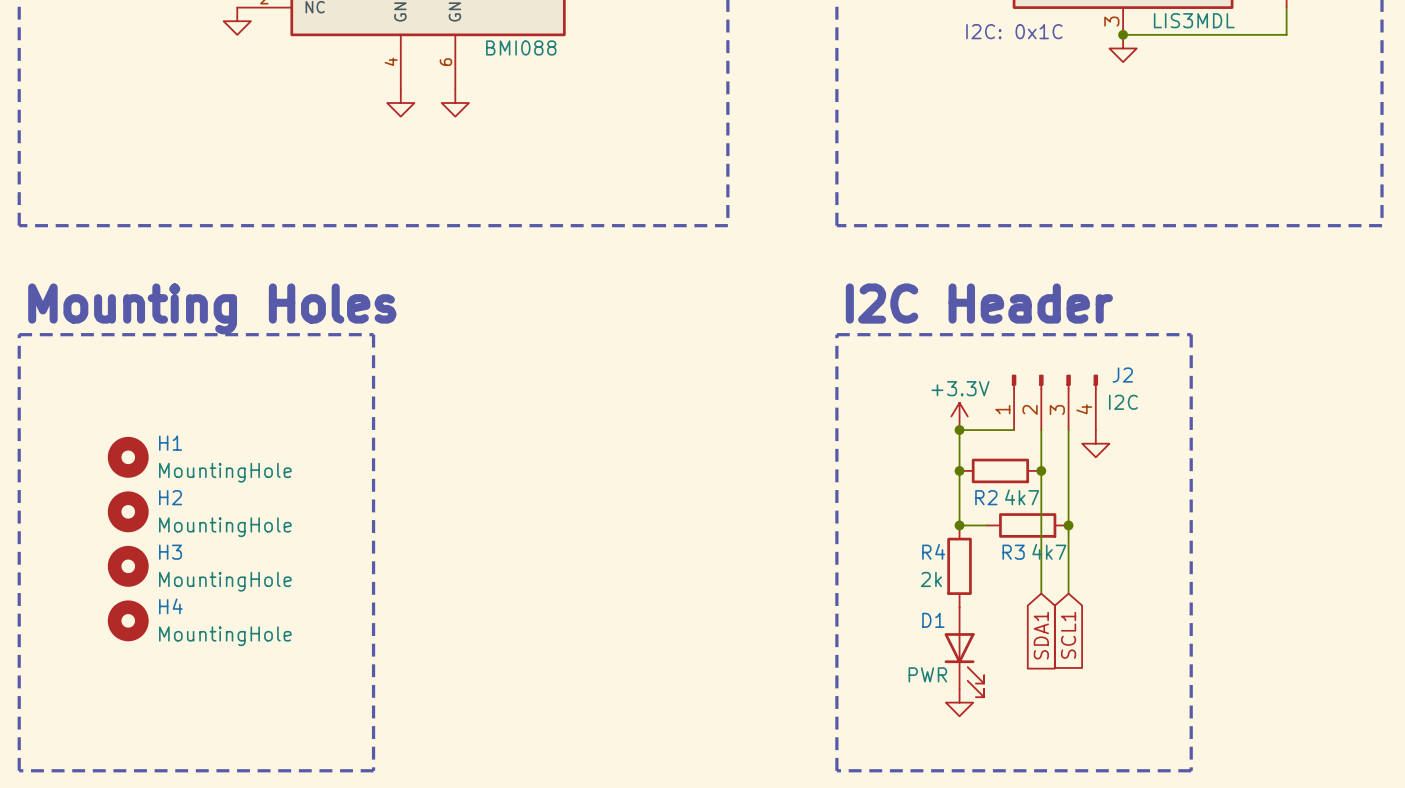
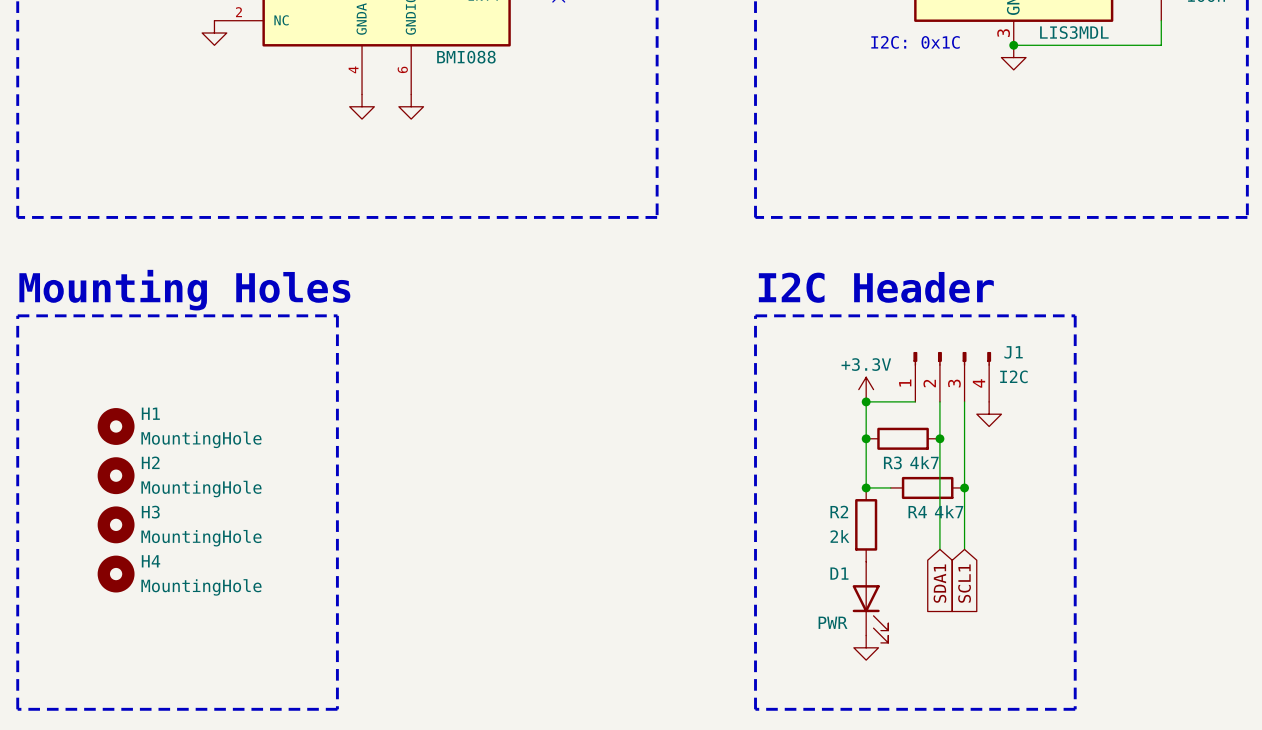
J2 name: J2 (1122, 375) -> J1 (1013, 352)
R2 name: R2 (986, 497) -> R3 (892, 462)
R4 name: R4 (933, 551) -> R2 (839, 512)
R3 name: R3 (1013, 552) -> R4 (917, 512)

